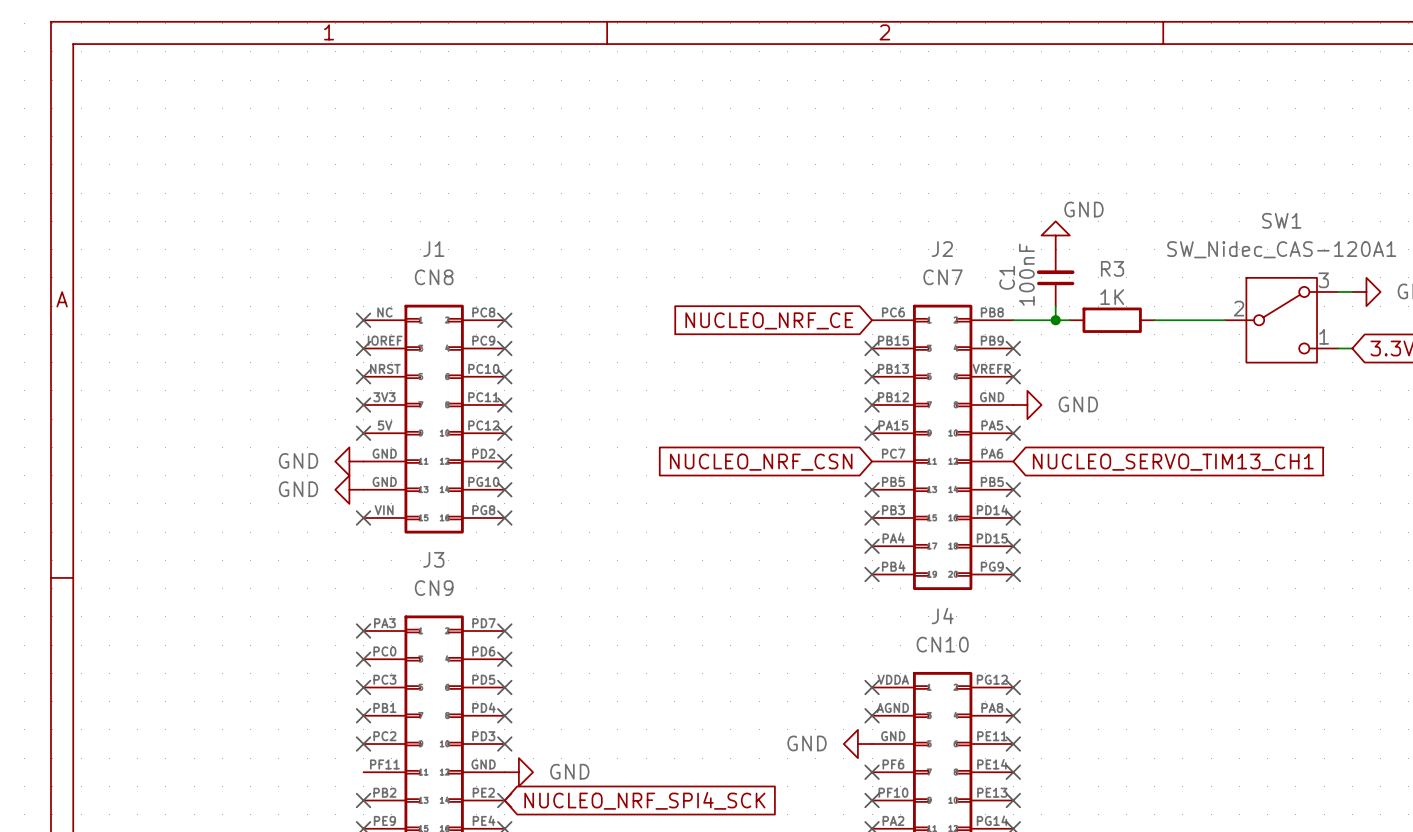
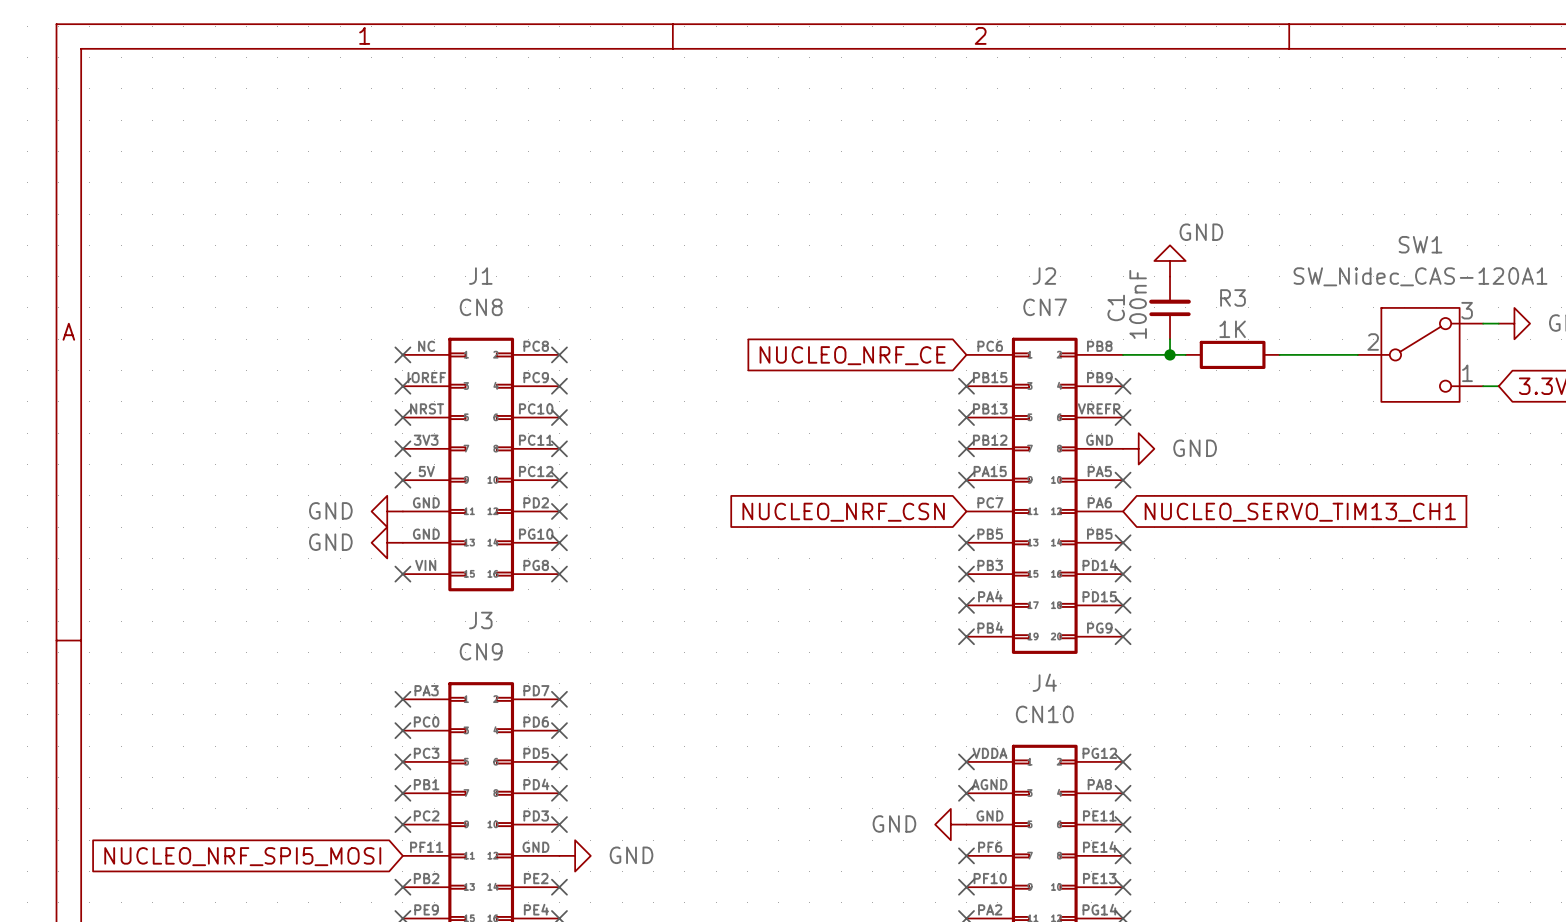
global label: none -> NUCLEO_NRF_SPI5_MOSI (242, 856)
global label: NUCLEO_NRF_SPI4_SCK (644, 800) -> none

